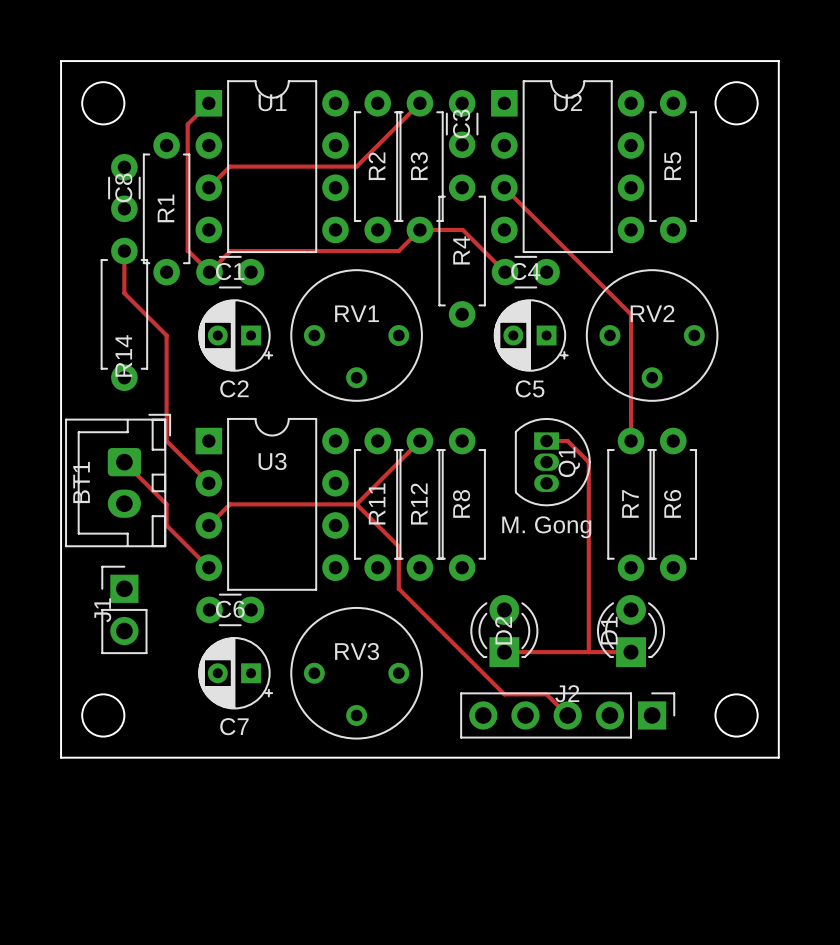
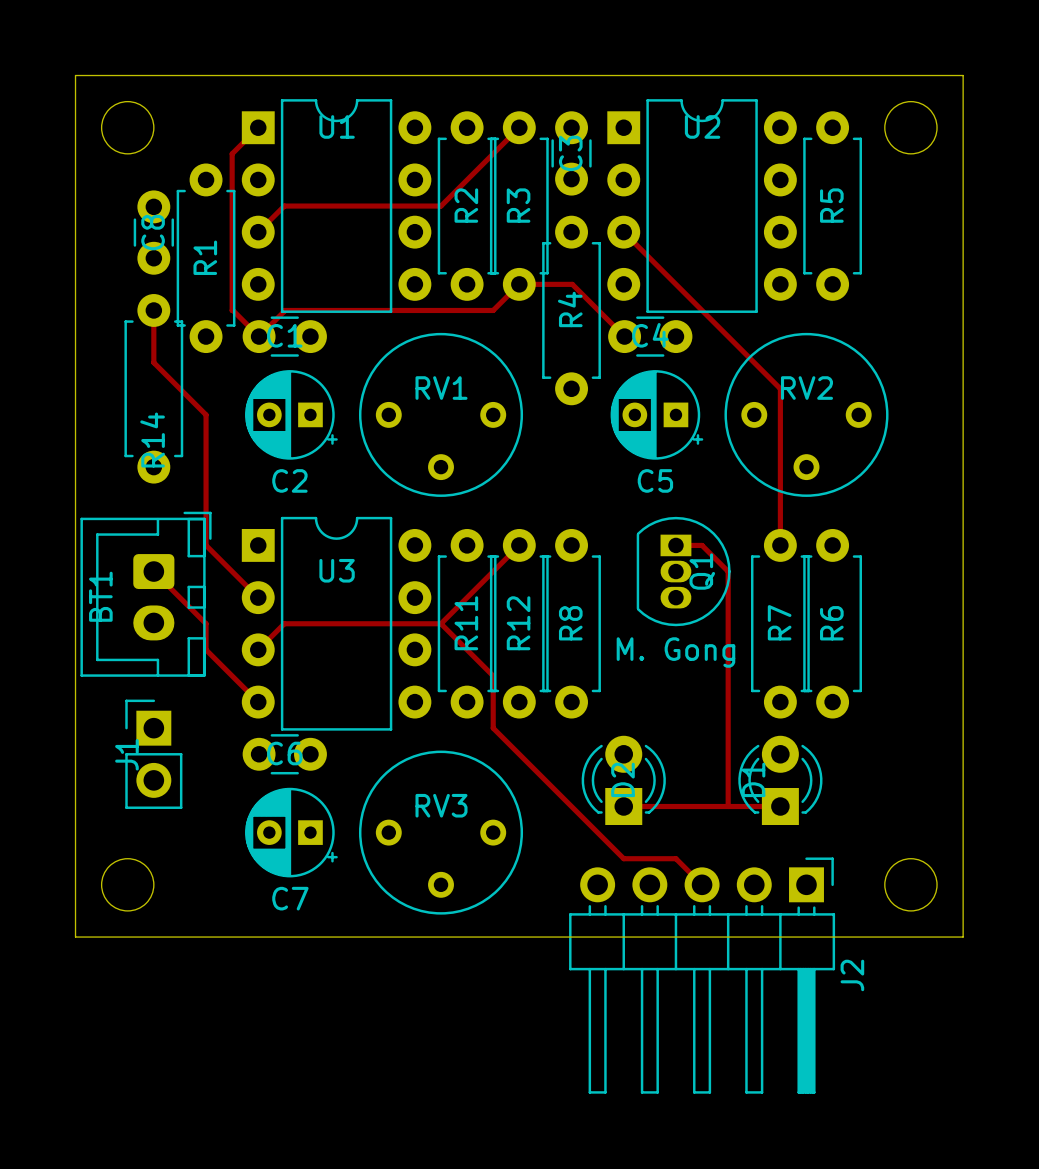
J2 footprint: [460, 692, 676, 739] -> [569, 857, 836, 1094]
J2 name position: J2 (567, 693) -> J2 (852, 975)

